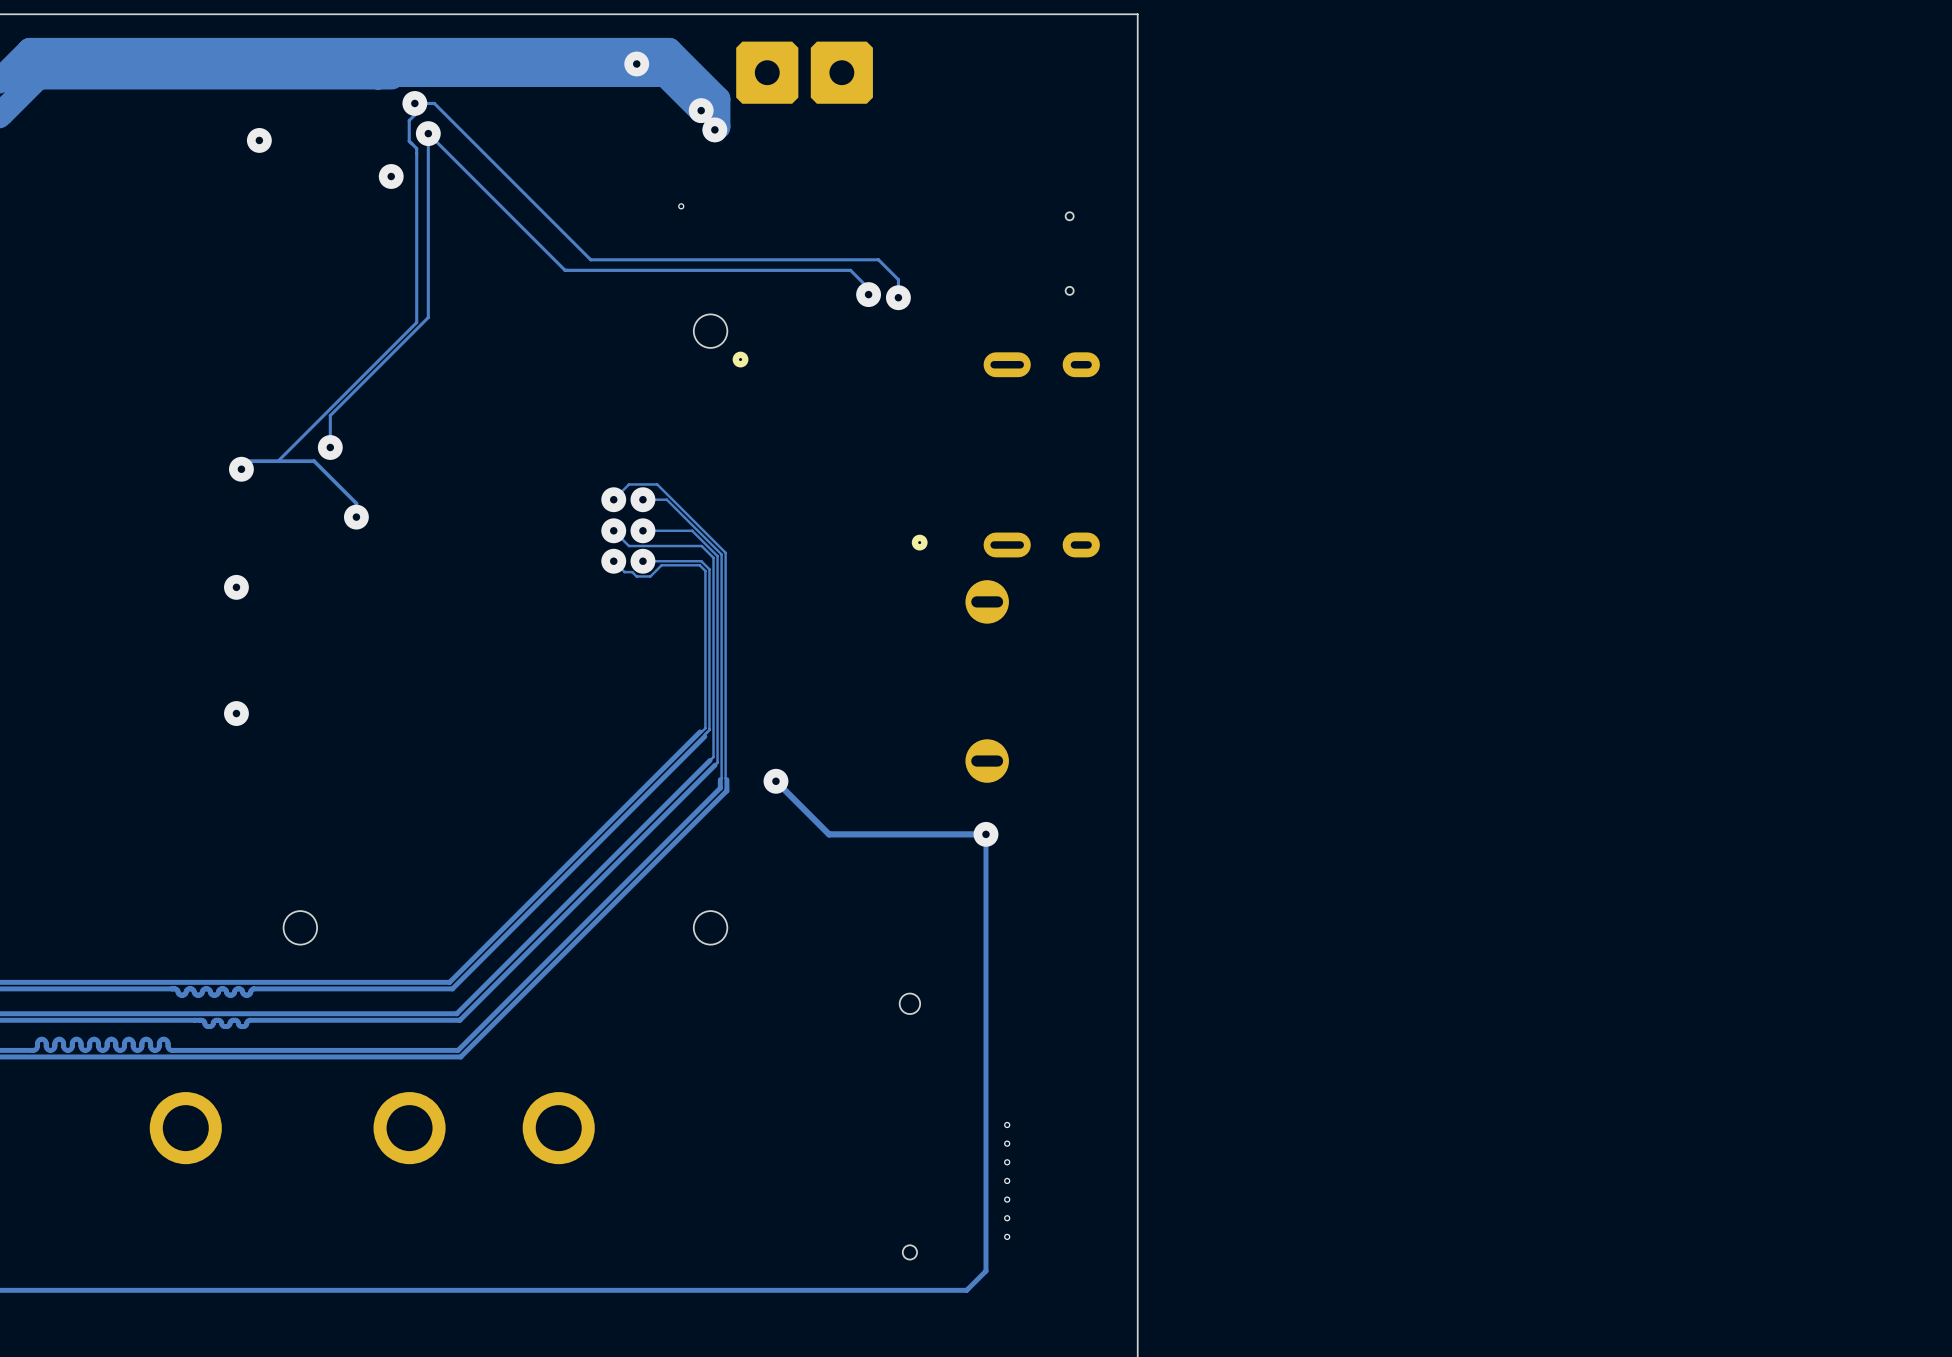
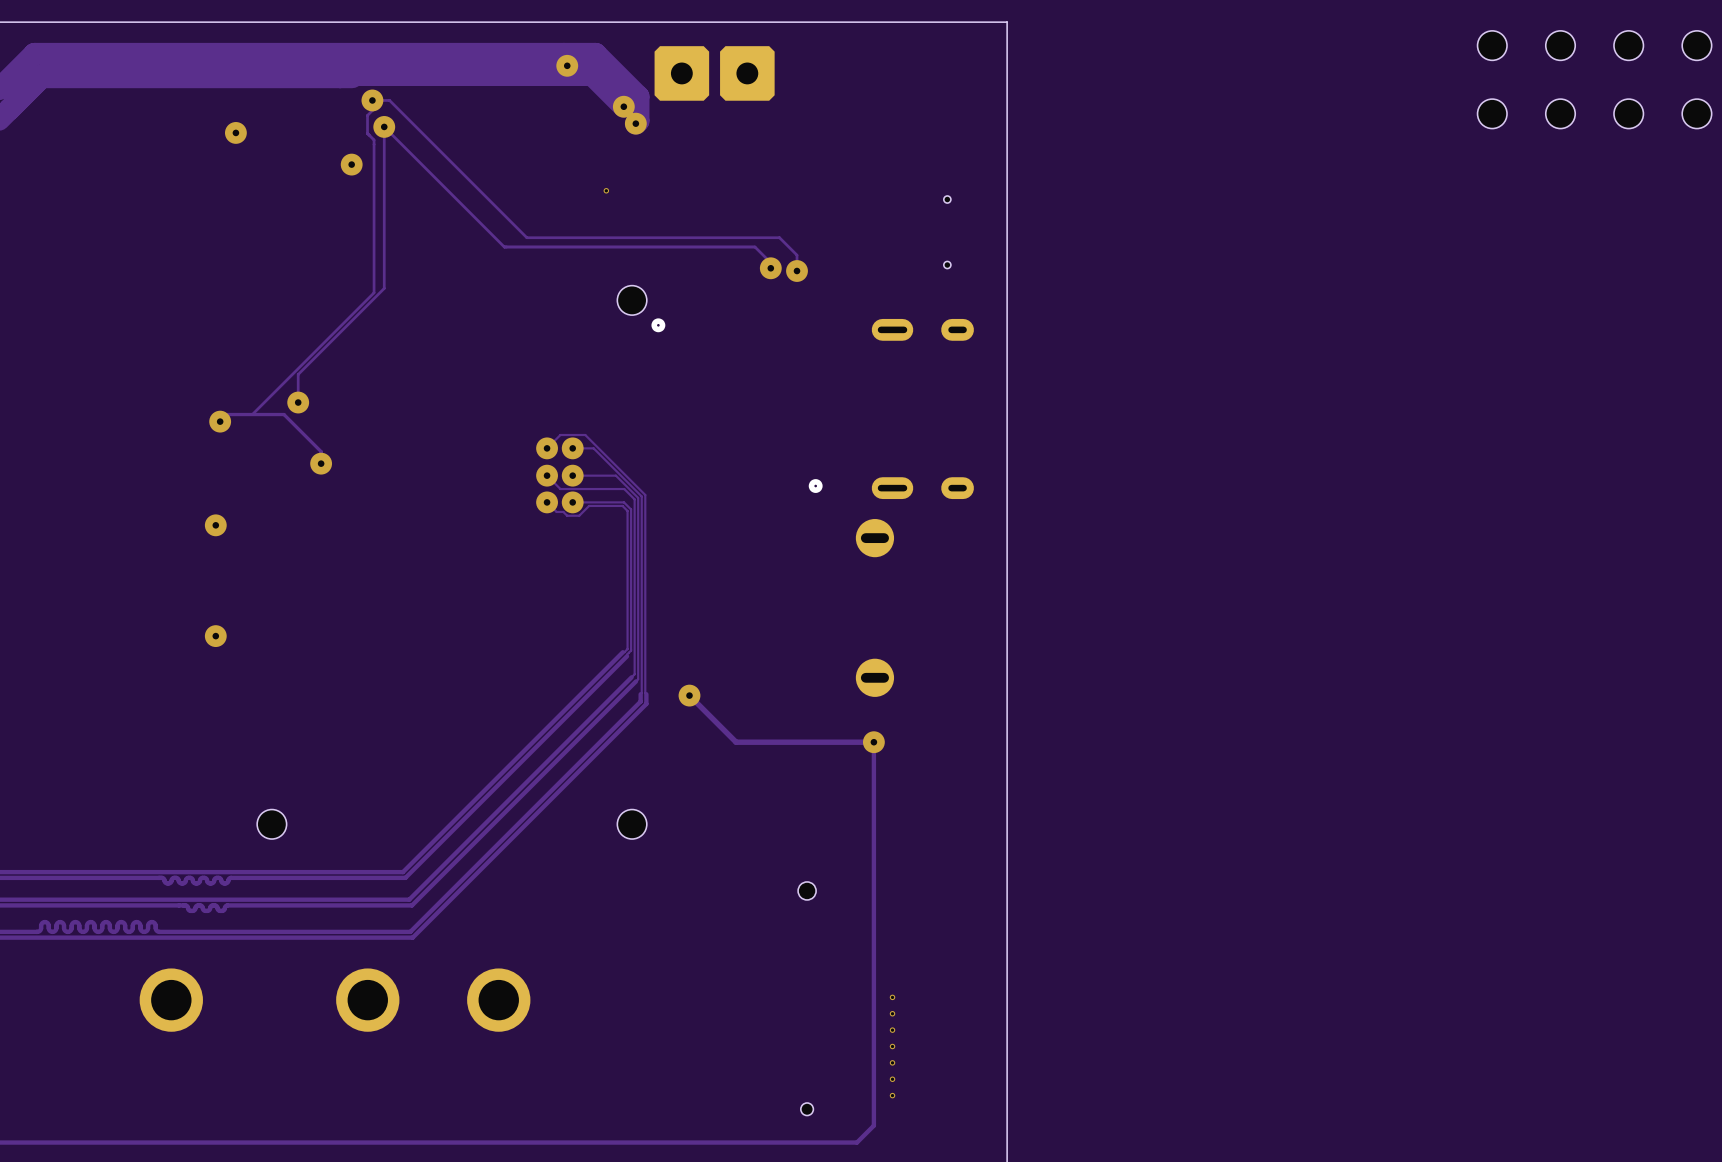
part: none -> (1492, 45)
part: none -> (1560, 45)
part: none -> (1628, 45)
part: none -> (1696, 45)
part: none -> (1492, 113)
part: none -> (1560, 113)
part: none -> (1628, 113)
part: none -> (1696, 113)

